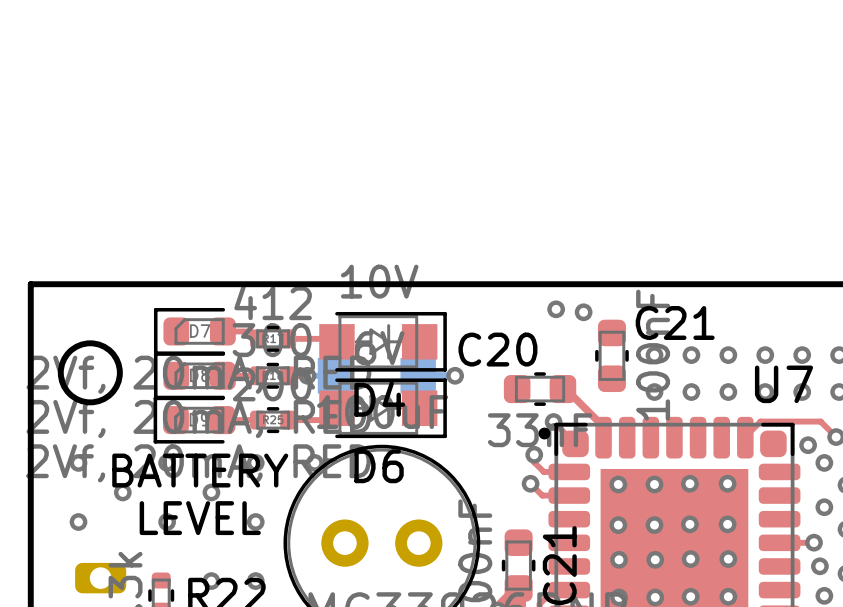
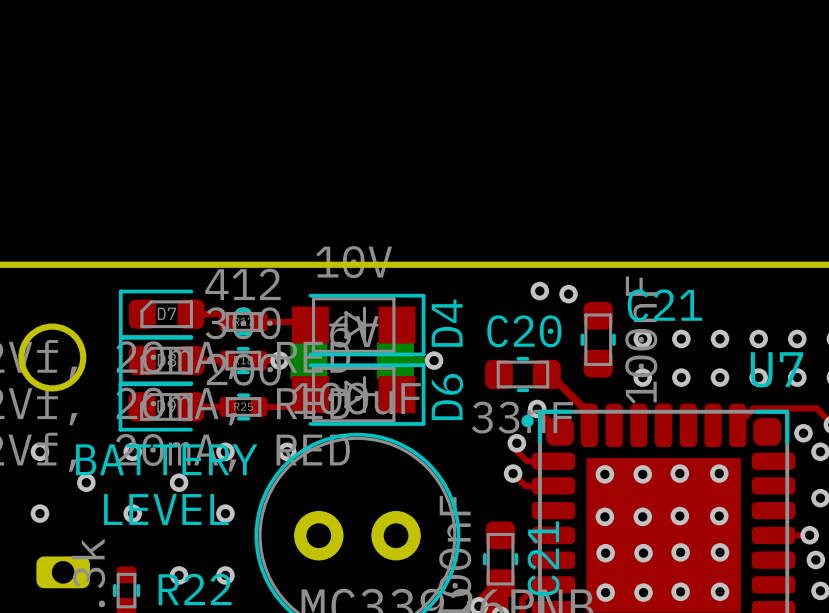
C20 name position: C20 (497, 349) -> C20 (524, 331)
D4 name rotation: 0° (379, 399) -> 90° counterclockwise (447, 323)
D4 name position: D4 (379, 399) -> D4 (447, 323)
D6 name rotation: 0° (379, 466) -> 90° counterclockwise (447, 397)
D6 name position: D6 (379, 466) -> D6 (447, 397)

